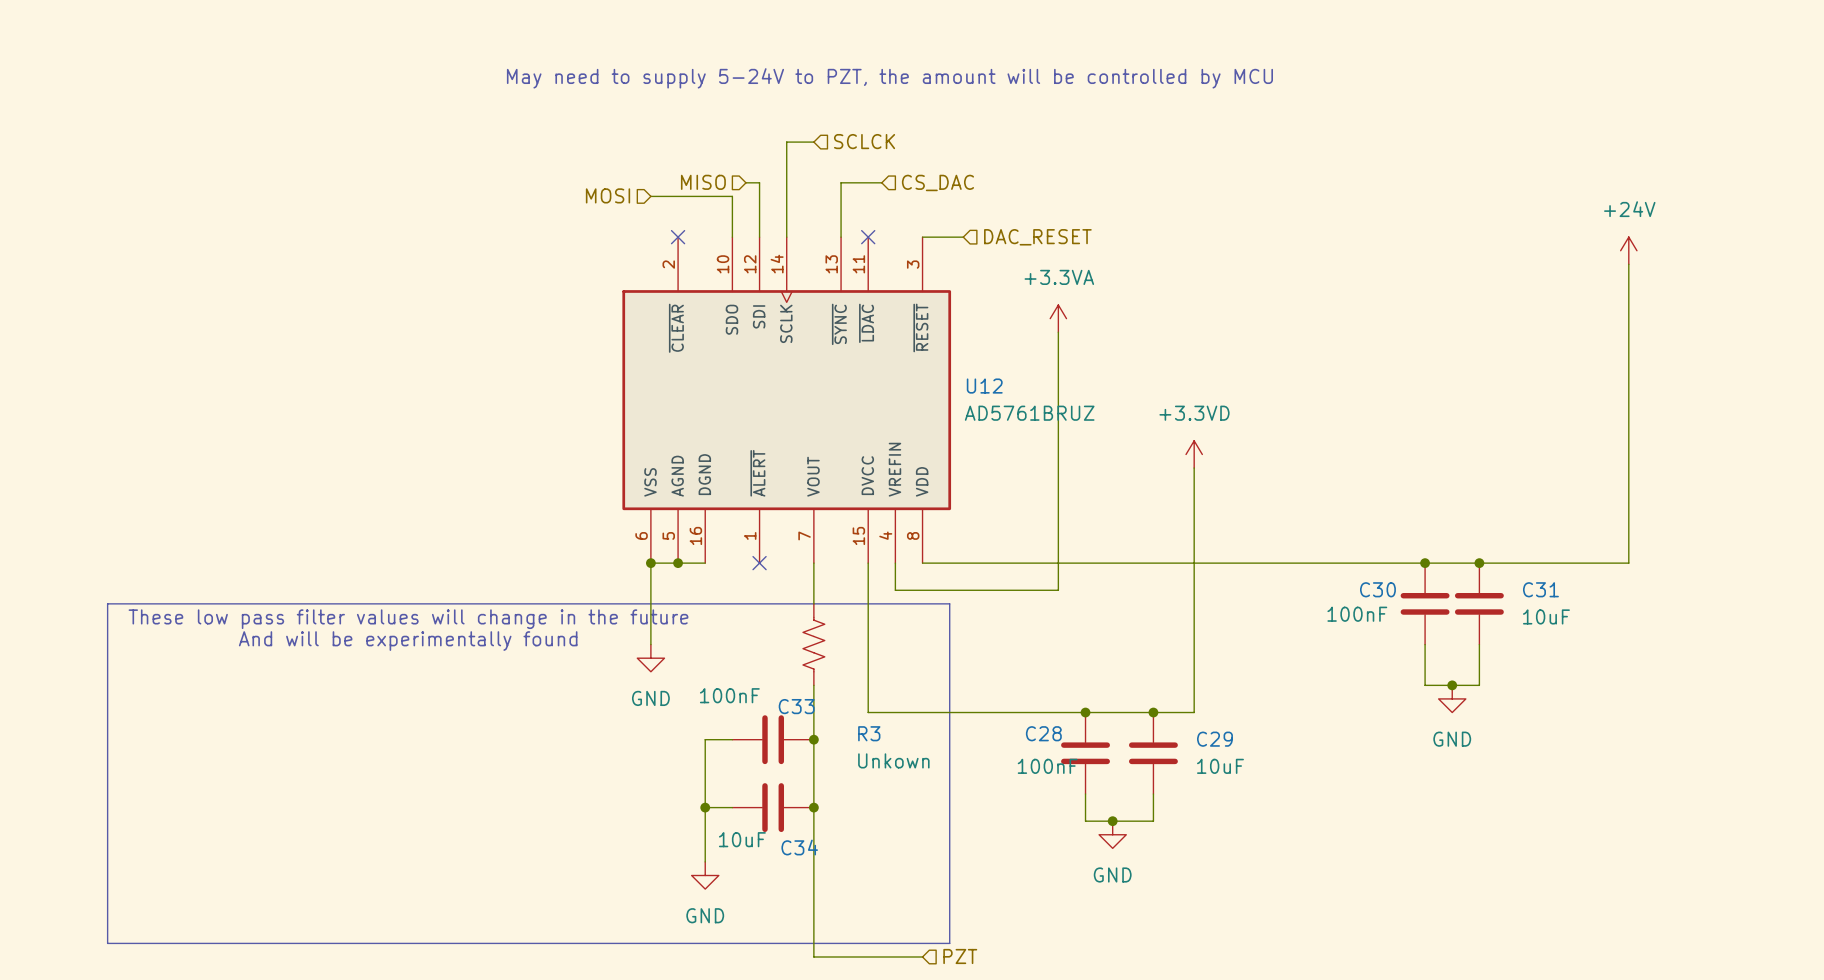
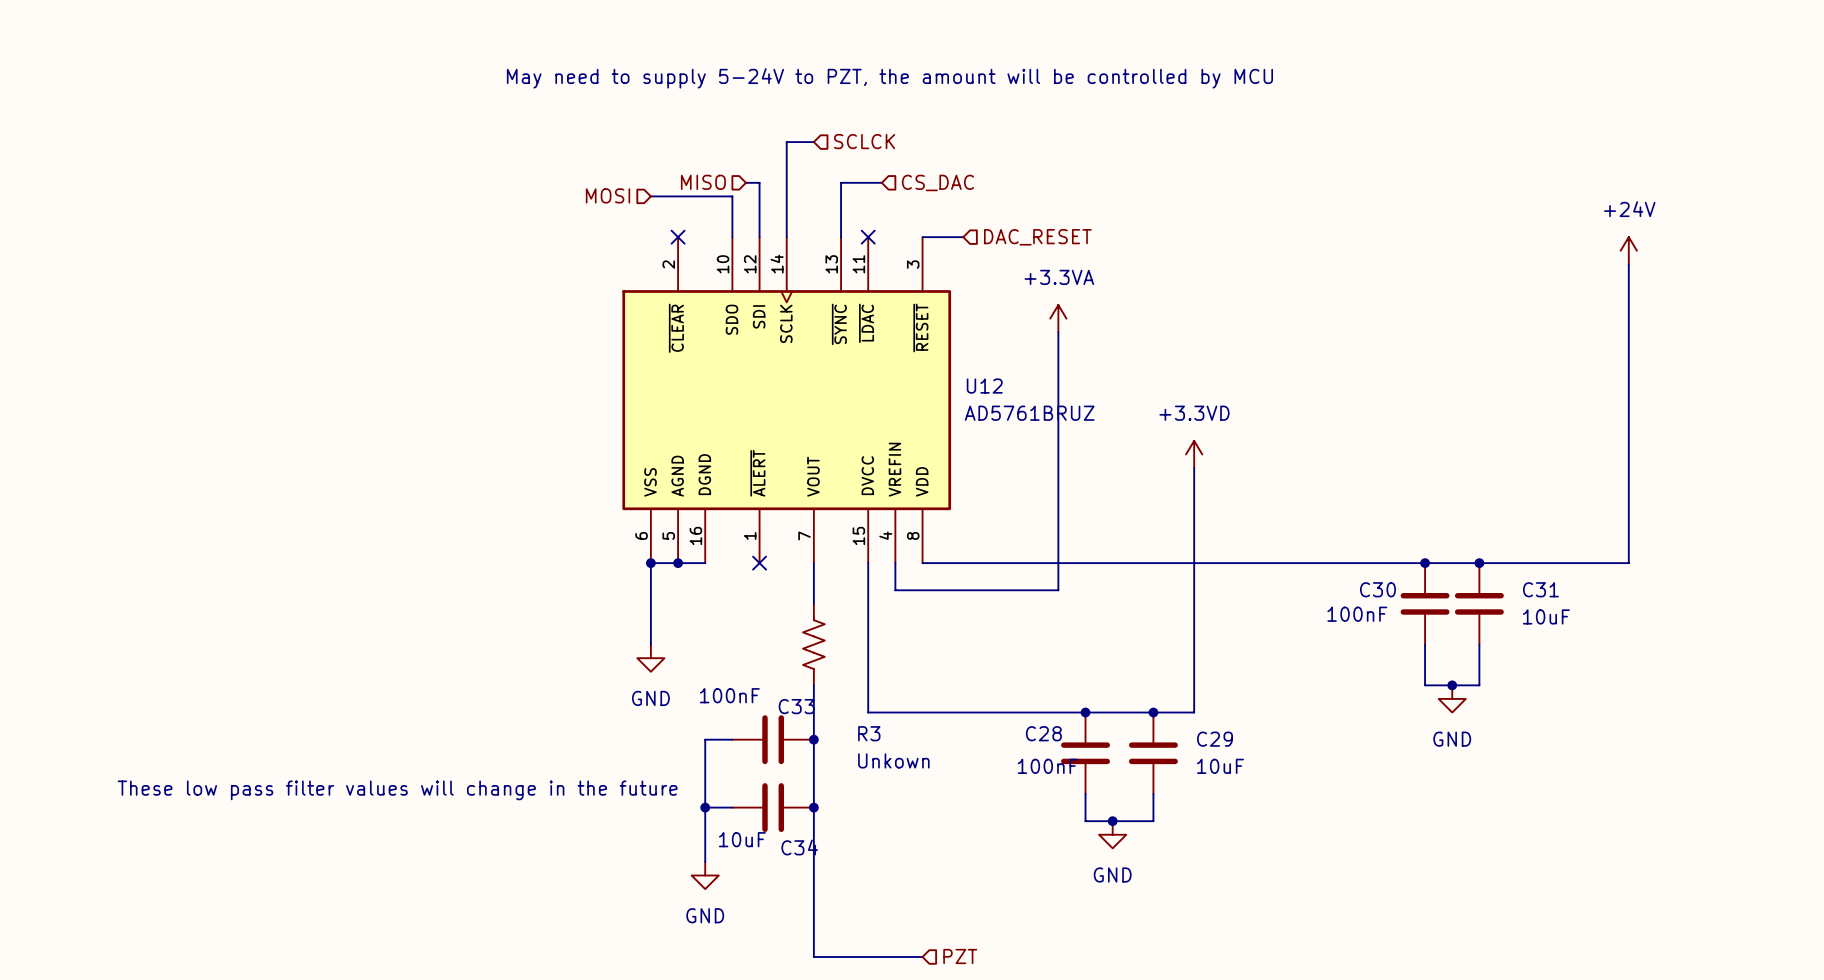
line: (107, 603) (949, 603) (949, 943) (107, 943) (107, 603) -> none
text position: These low pass filter values will change in the future (408, 619) -> These low pass filter values will change in the future (397, 790)
text: And will be experimentally found (408, 641) -> none

